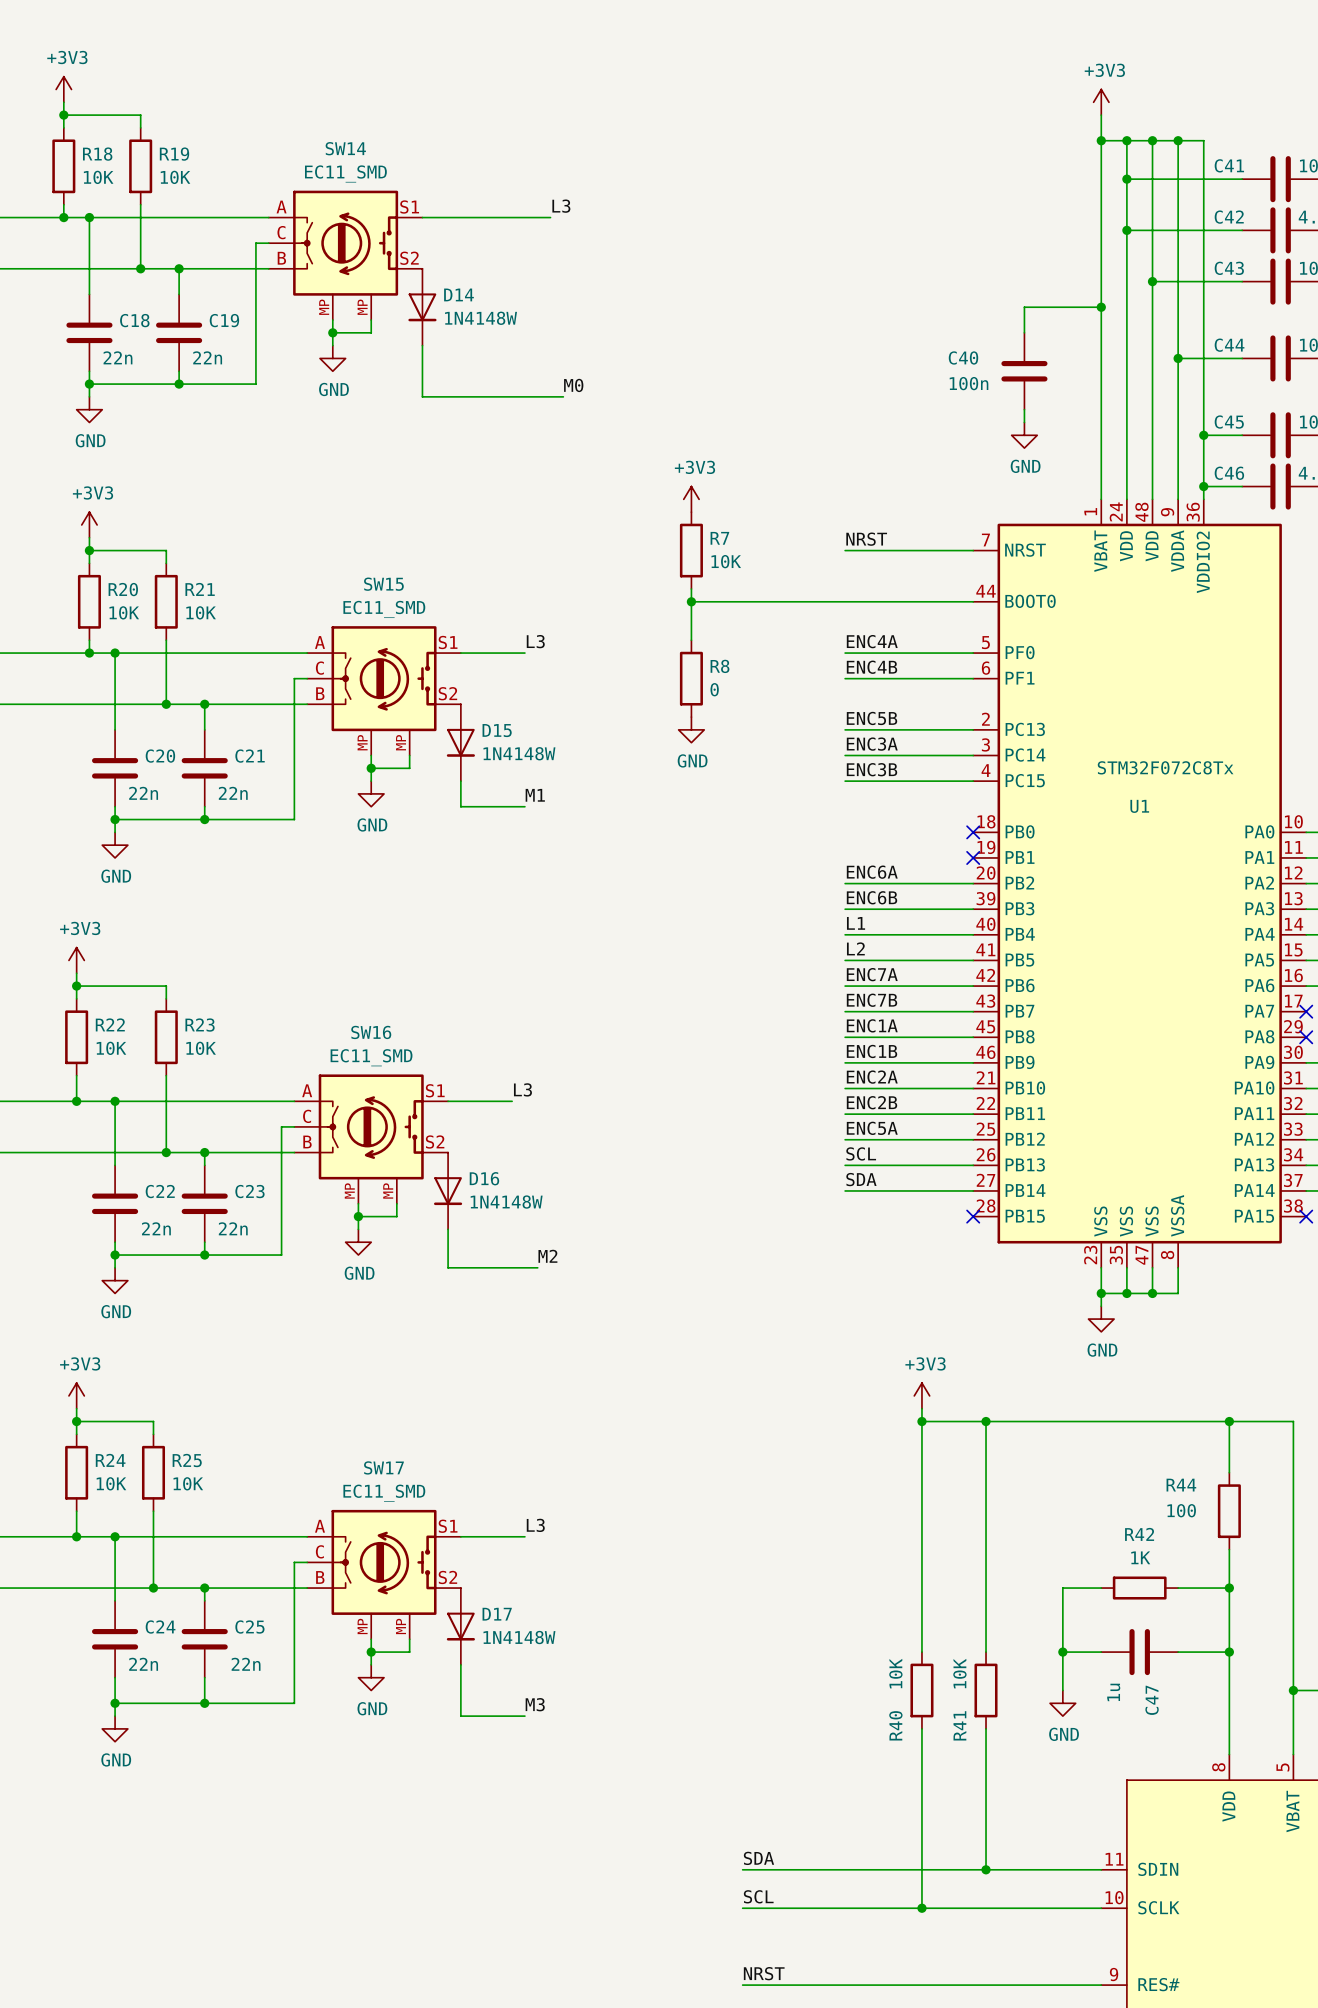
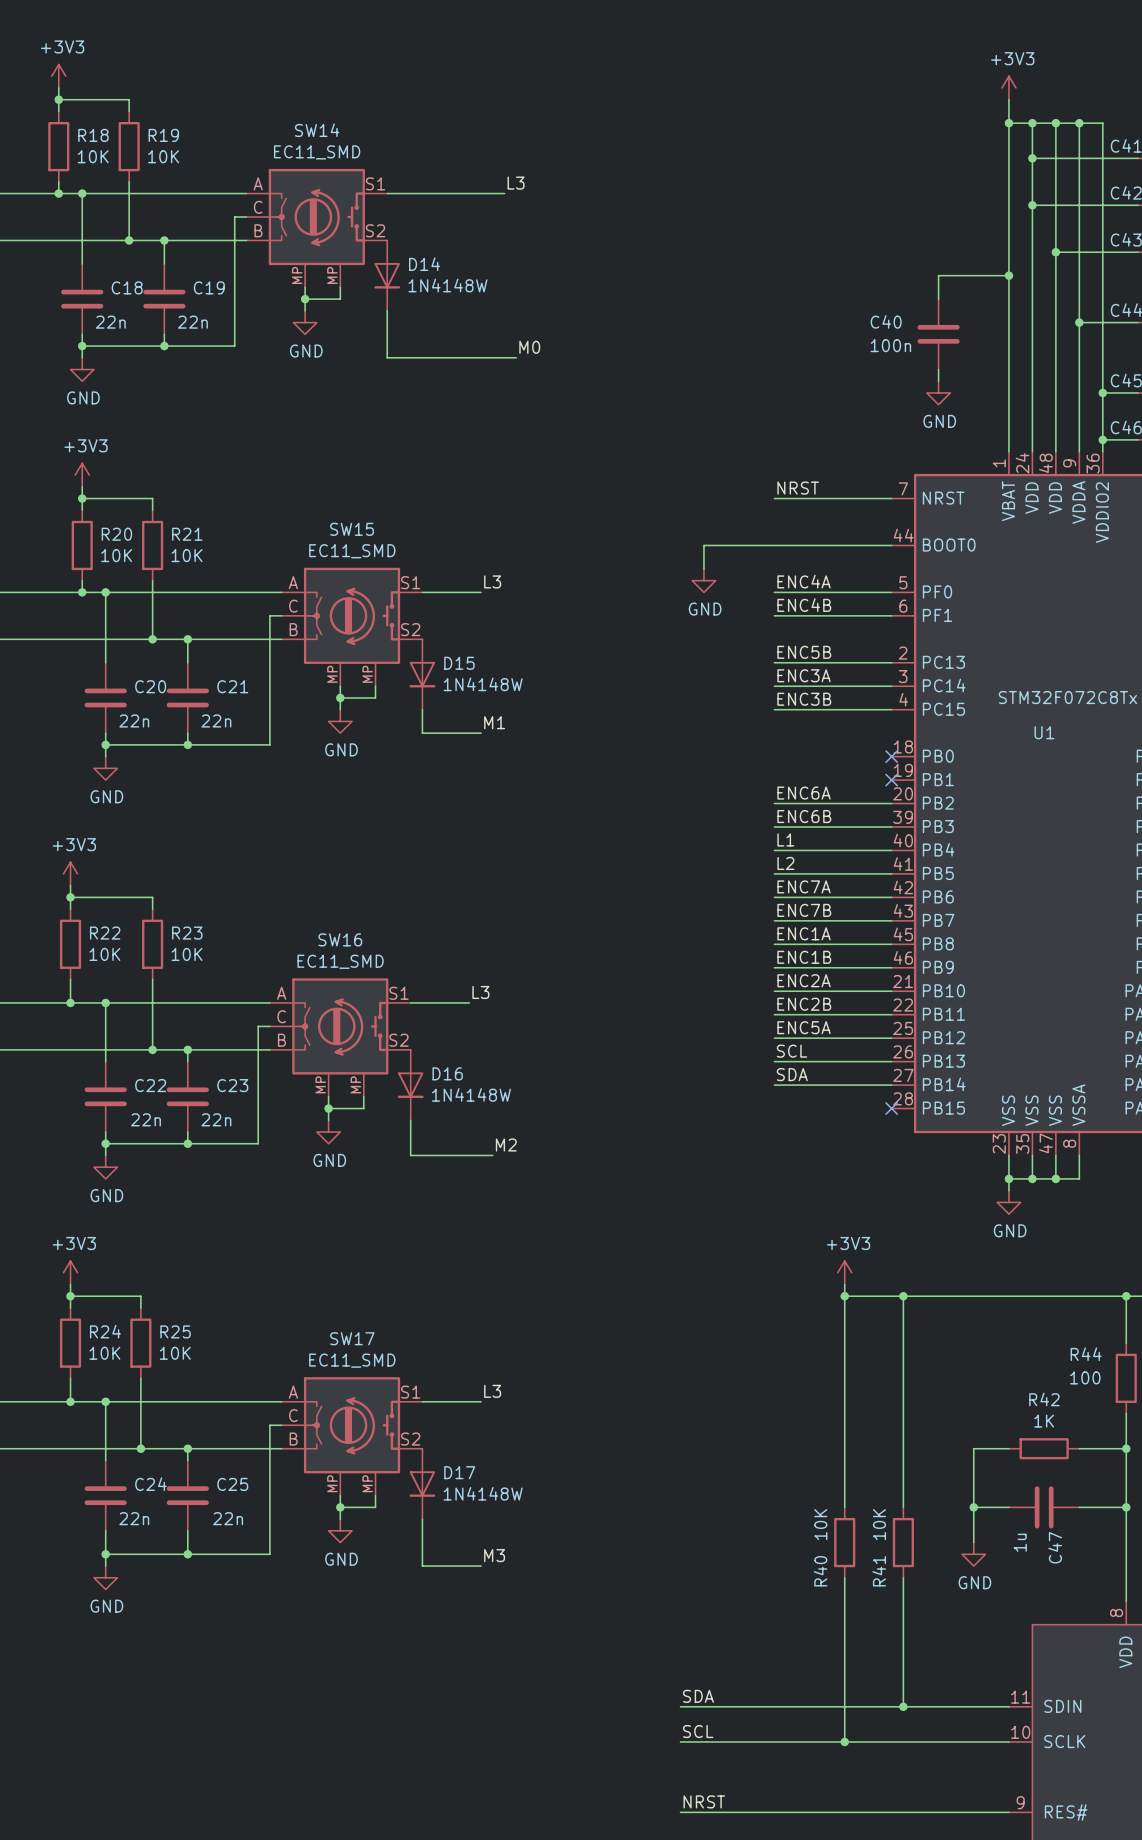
power symbol: +3V3 (691, 499) -> none
R7: 10K (691, 550) -> none
wire: (691, 589) (691, 640) -> none
wire: (691, 601) (768, 601) -> (703, 568) (703, 545)
junction: (691, 601) -> none
R8: 0 (691, 678) -> none
power symbol position: GND (691, 729) -> GND (703, 580)

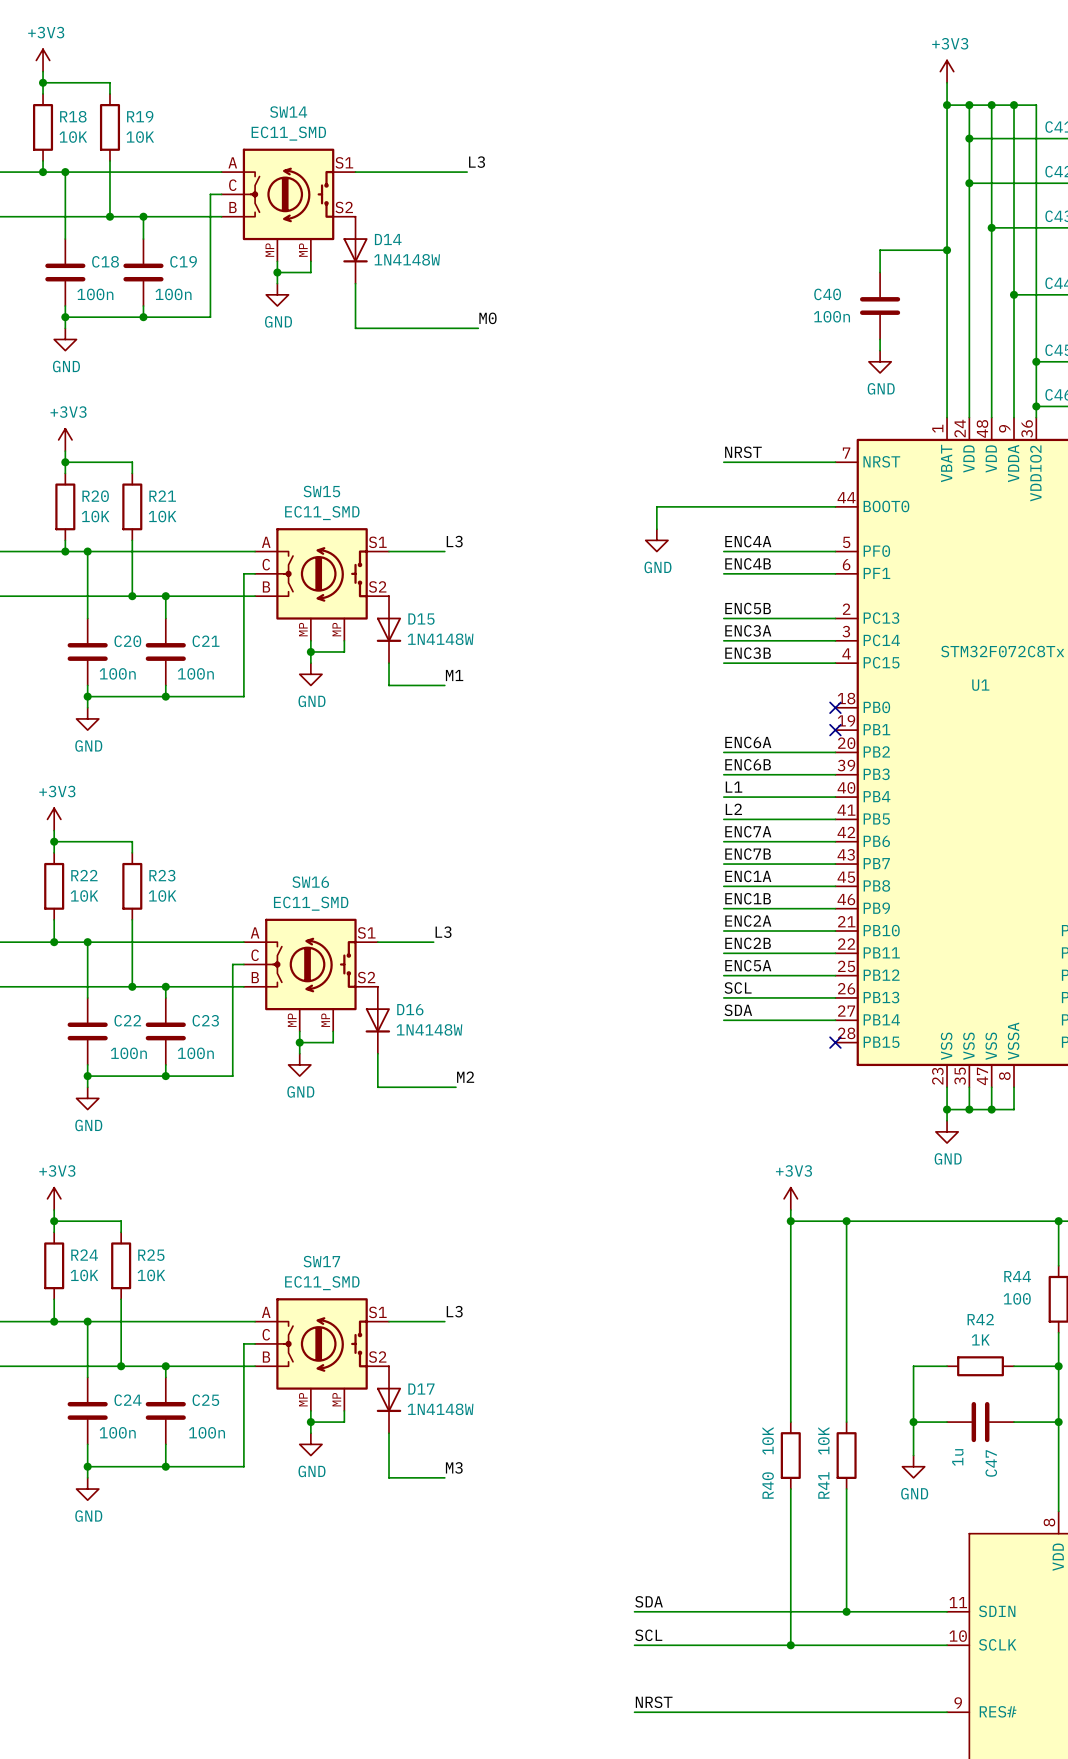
C18 value: 22n (110, 322) -> 100n (95, 294)
C19 value: 22n (192, 322) -> 100n (173, 294)
C20 value: 22n (134, 720) -> 100n (117, 673)
C21 value: 22n (216, 720) -> 100n (195, 673)
C22 value: 22n (146, 1119) -> 100n (128, 1053)
C23 value: 22n (216, 1119) -> 100n (195, 1053)
C24 value: 22n (134, 1518) -> 100n (117, 1432)
C25 value: 22n (228, 1518) -> 100n (206, 1432)

